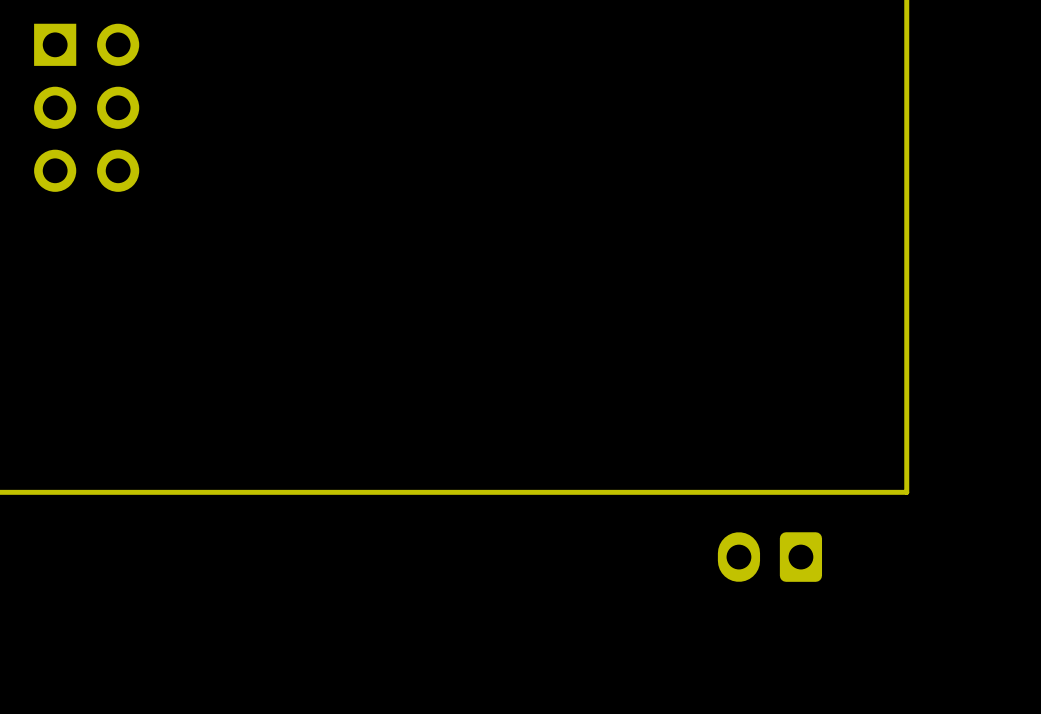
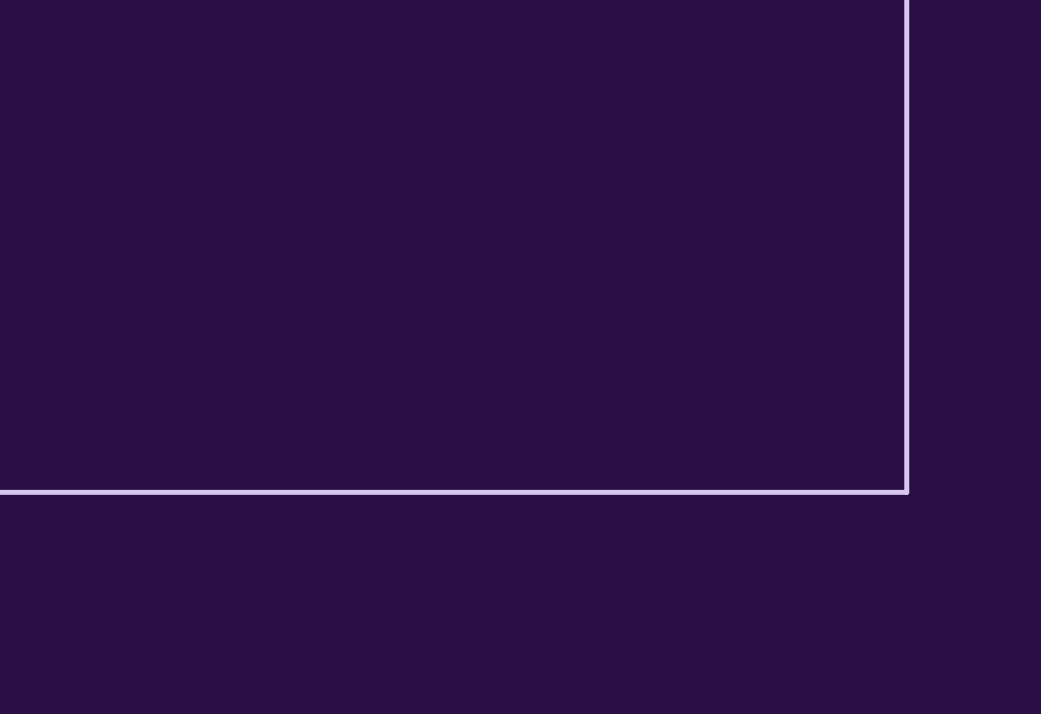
part: (86, 107) -> none
part: (769, 557) -> none

